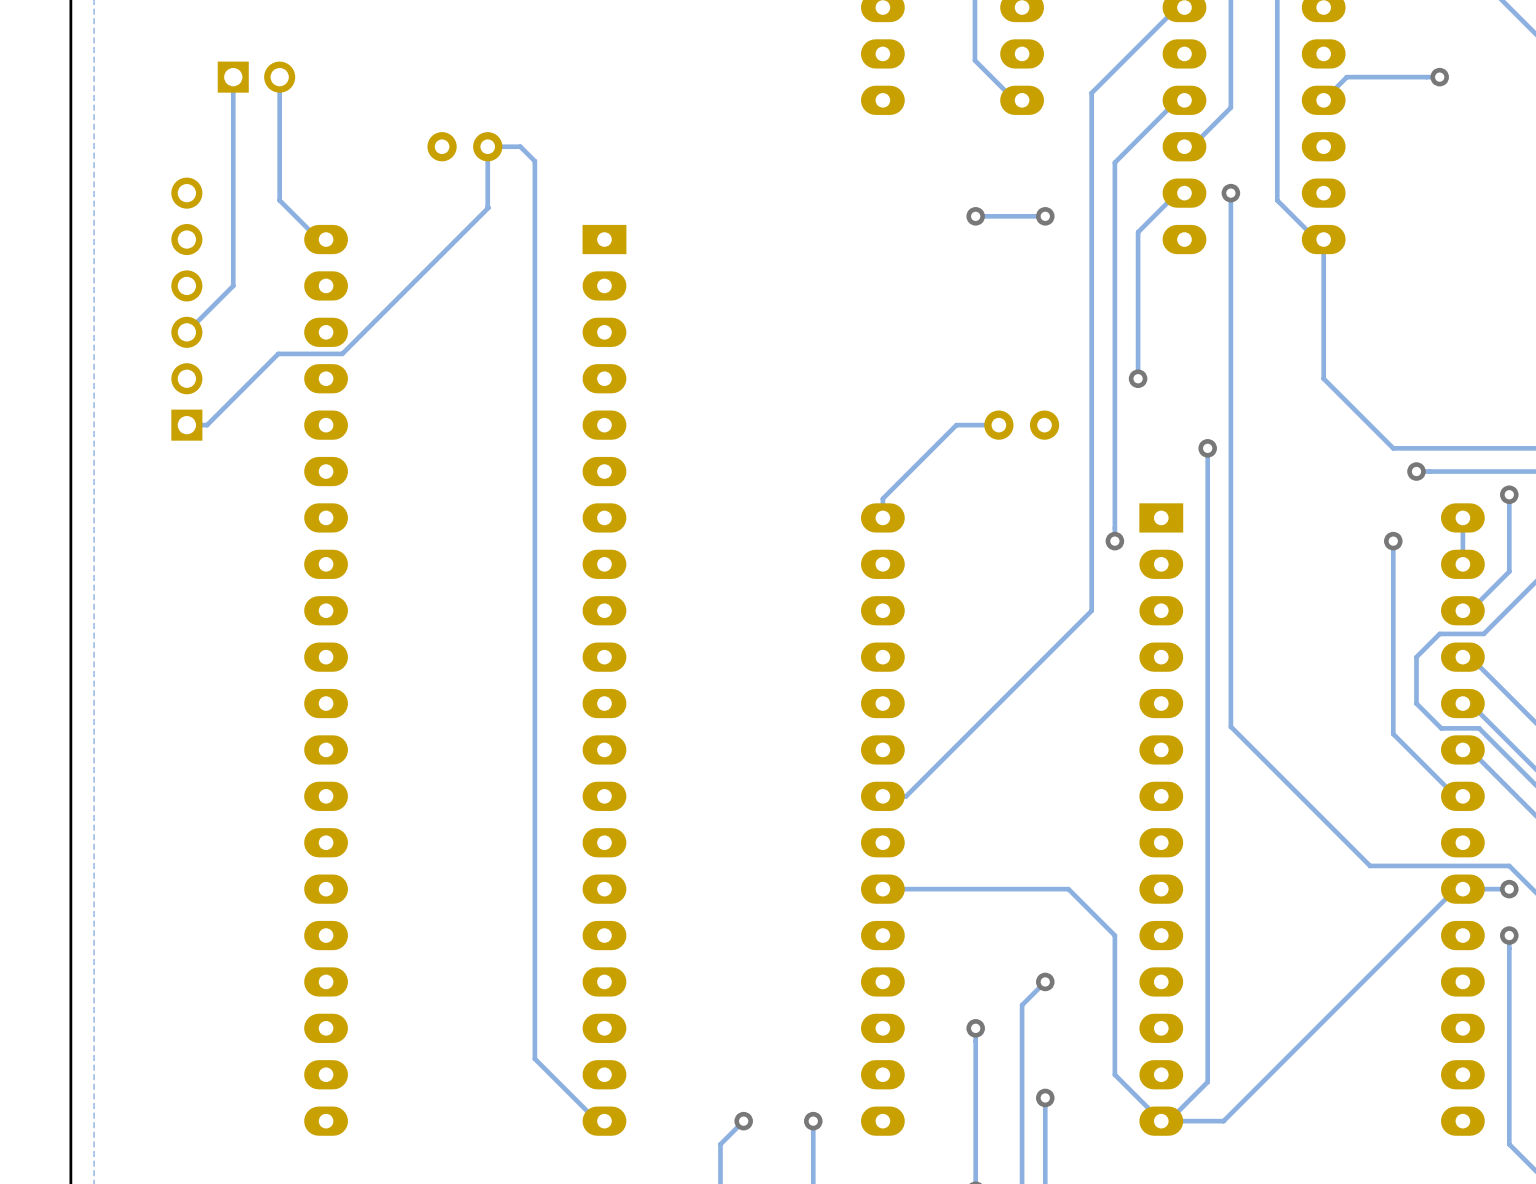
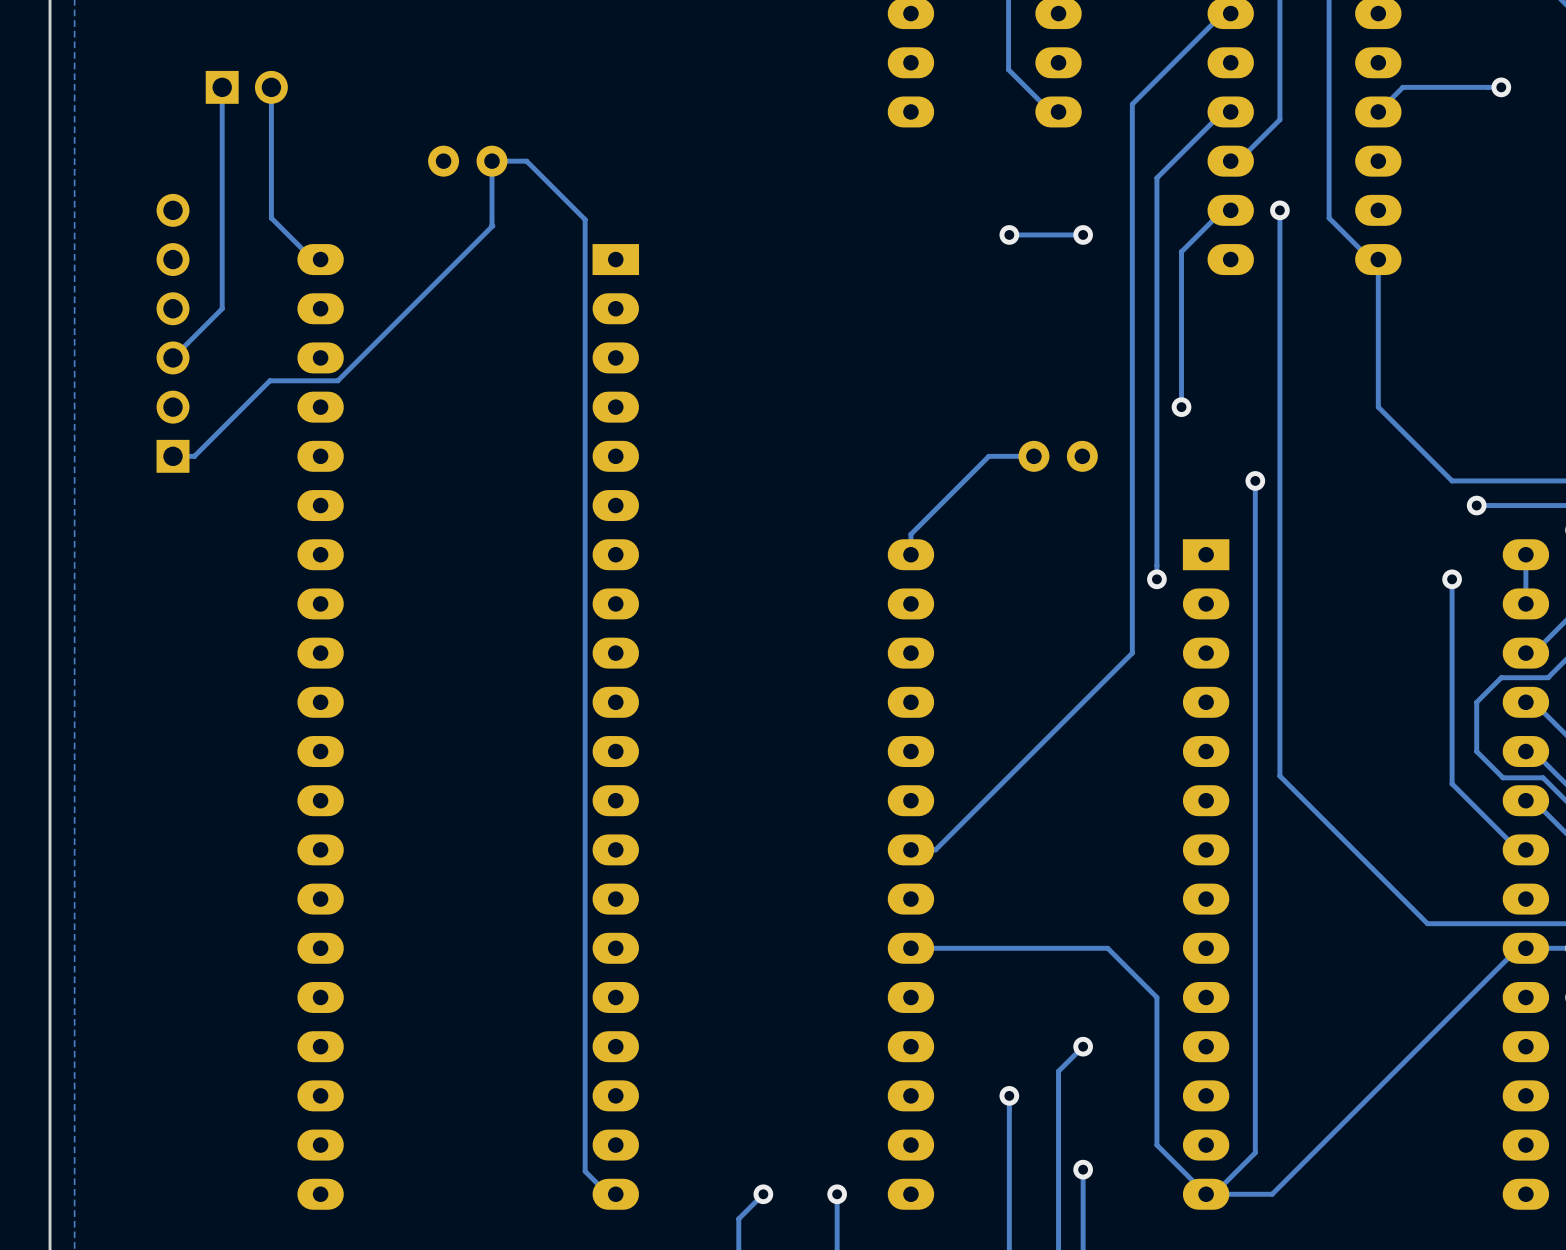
track: (534, 161) (534, 1058) (575, 1099) -> (541, 176) (585, 219) (585, 1171)

